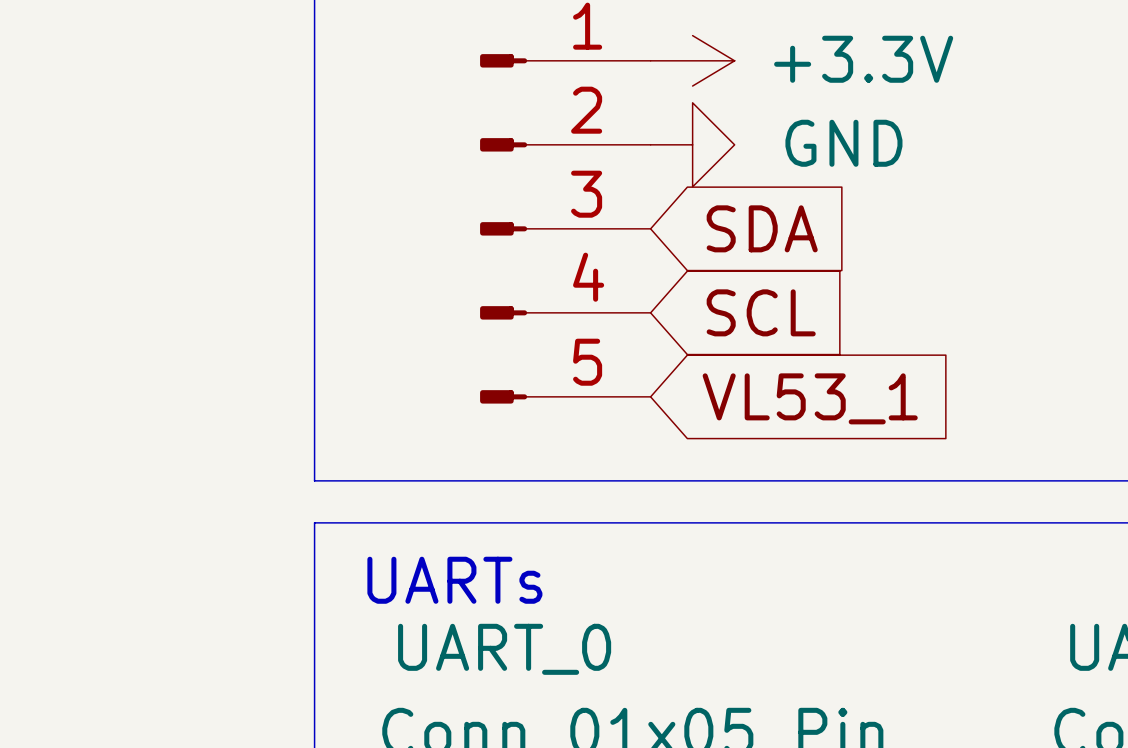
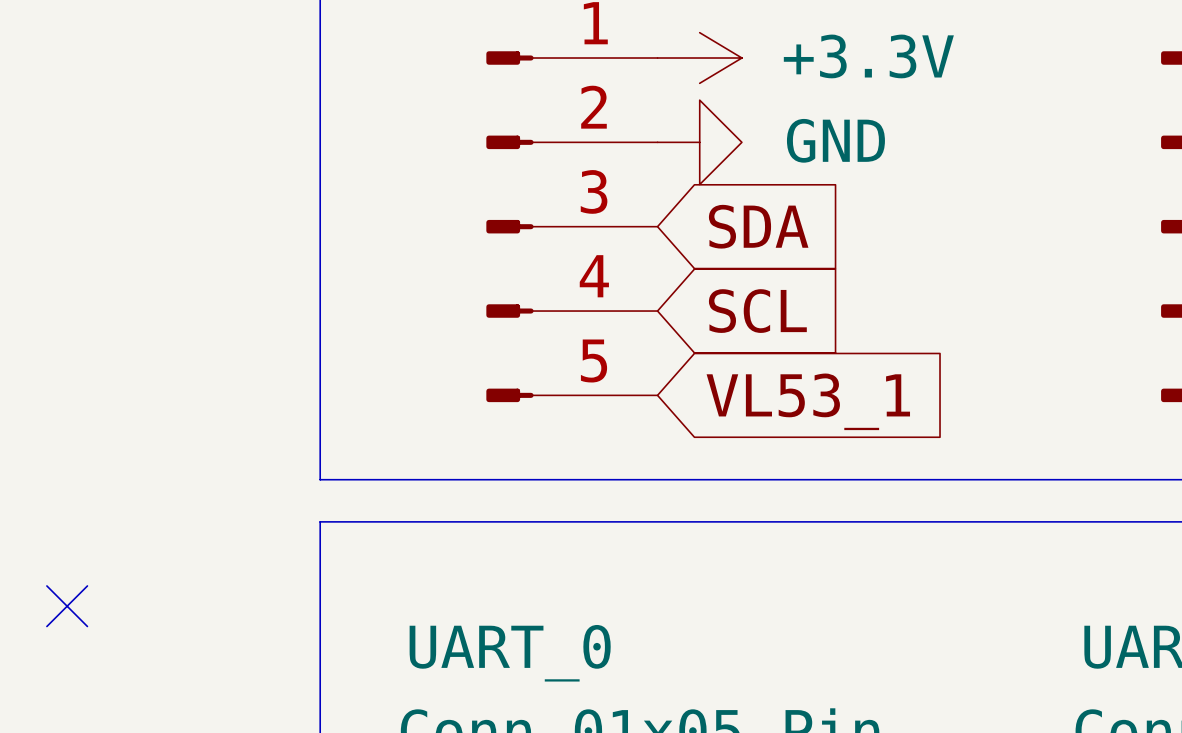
text: UARTs (454, 580) -> none
no-connect mark: none -> (67, 606)

